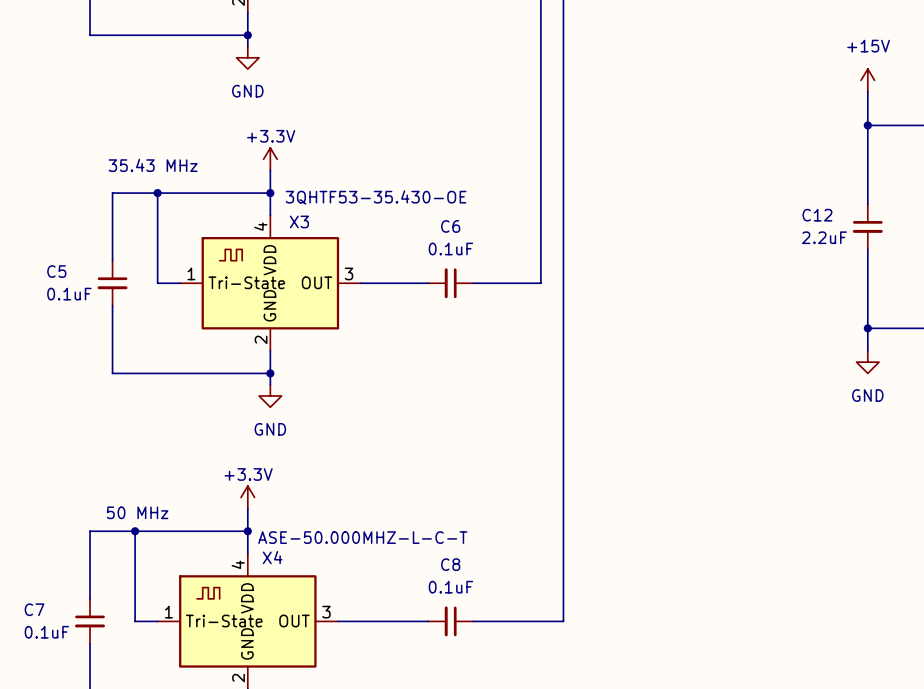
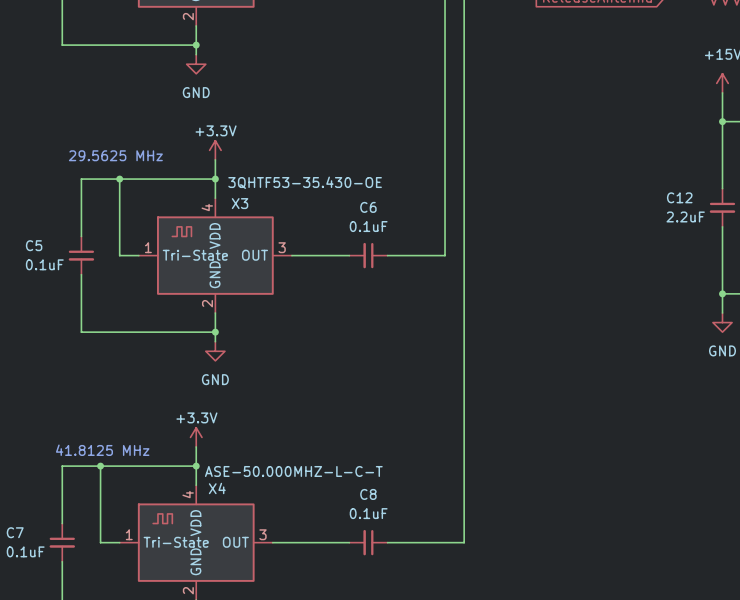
text: 35.43 MHz (153, 165) -> 29.5625 MHz (115, 155)
text: 50 MHz (137, 512) -> 41.8125 MHz (102, 450)

